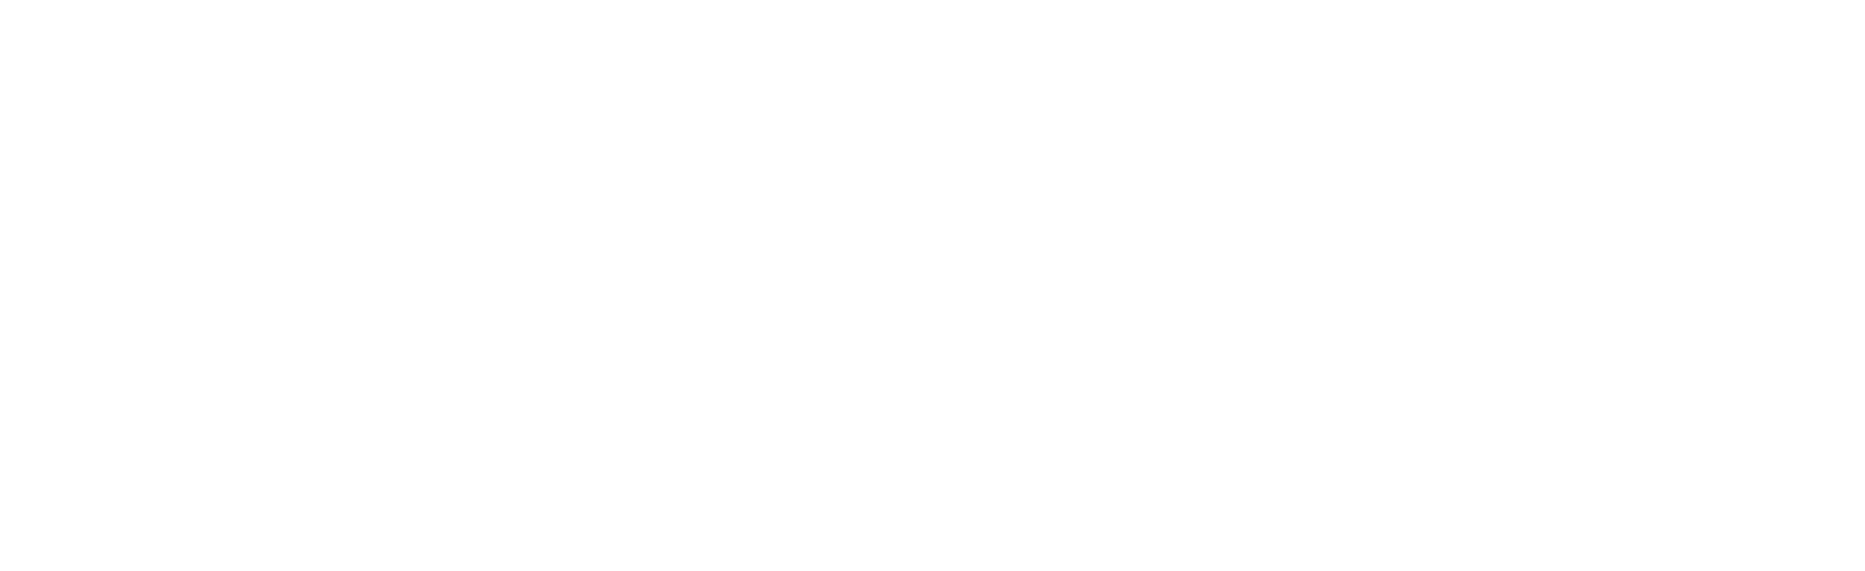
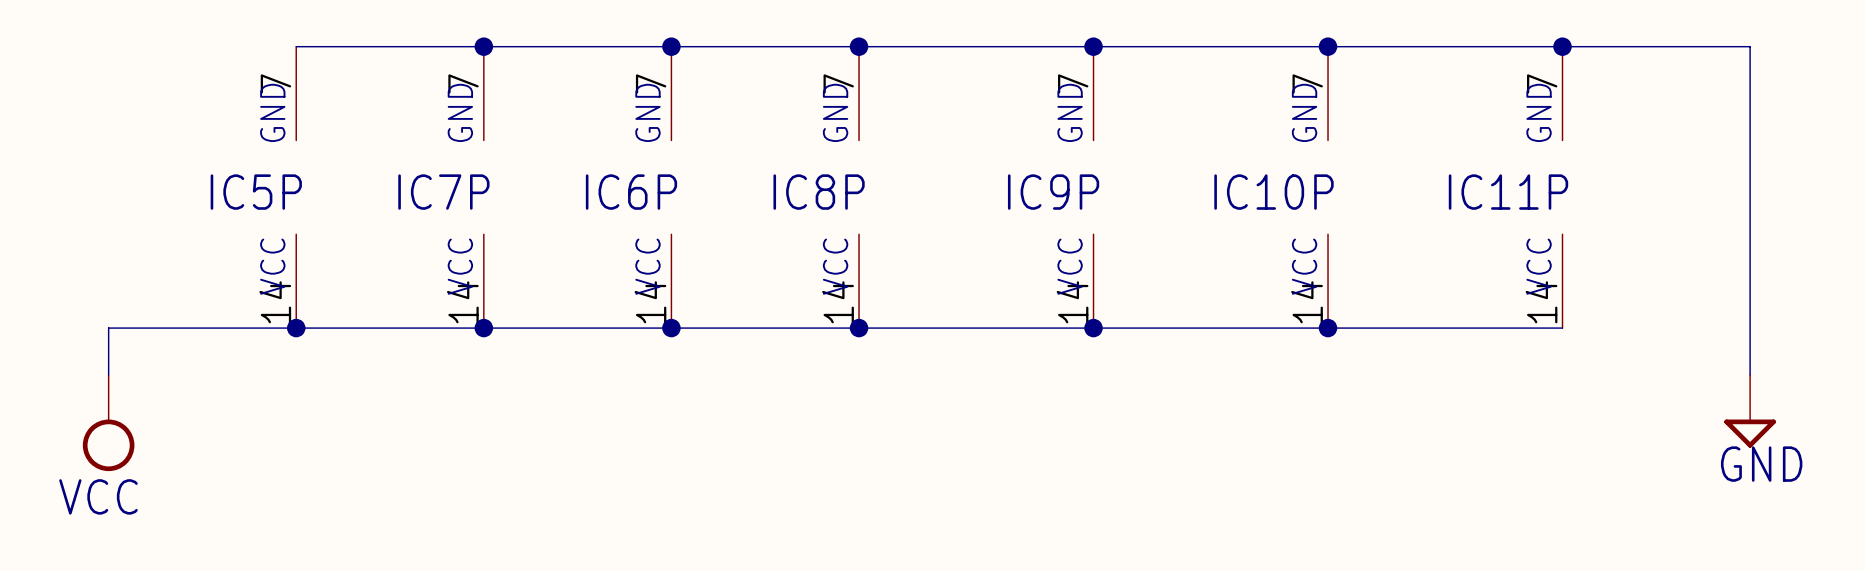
wire: none -> (296, 46) (1750, 46) (1750, 374)
junction: none -> (483, 46)
junction: none -> (671, 46)
junction: none -> (859, 46)
junction: none -> (1093, 46)
junction: none -> (1328, 46)
junction: none -> (1562, 46)
IC5P: none -> (296, 187)
IC7P: none -> (483, 187)
IC6P: none -> (671, 187)
IC8P: none -> (859, 187)
IC9P: none -> (1093, 187)
IC10P: none -> (1328, 187)
IC11P: none -> (1562, 187)
junction: none -> (296, 328)
junction: none -> (483, 328)
junction: none -> (671, 328)
junction: none -> (859, 328)
junction: none -> (1093, 328)
junction: none -> (1328, 328)
wire: none -> (1562, 328) (108, 328) (108, 374)
power symbol: none -> GND (1750, 411)
power symbol: none -> VCC (108, 423)

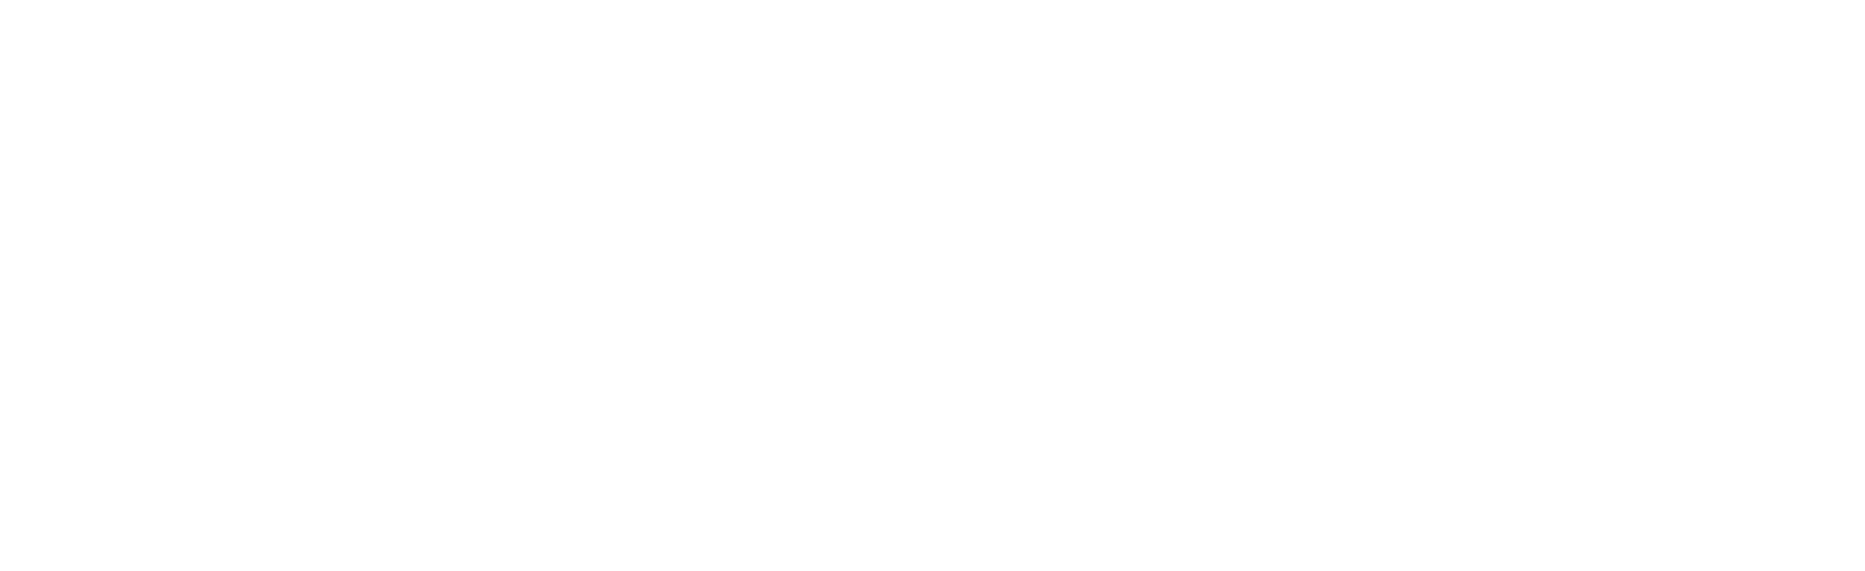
wire: (296, 46) (1750, 46) (1750, 374) -> none
junction: (483, 46) -> none
junction: (671, 46) -> none
junction: (859, 46) -> none
junction: (1093, 46) -> none
junction: (1328, 46) -> none
junction: (1562, 46) -> none
IC5P: (296, 187) -> none
IC7P: (483, 187) -> none
IC6P: (671, 187) -> none
IC8P: (859, 187) -> none
IC9P: (1093, 187) -> none
IC10P: (1328, 187) -> none
IC11P: (1562, 187) -> none
junction: (296, 328) -> none
junction: (483, 328) -> none
junction: (671, 328) -> none
junction: (859, 328) -> none
junction: (1093, 328) -> none
junction: (1328, 328) -> none
wire: (1562, 328) (108, 328) (108, 374) -> none
power symbol: GND (1750, 411) -> none
power symbol: VCC (108, 423) -> none

